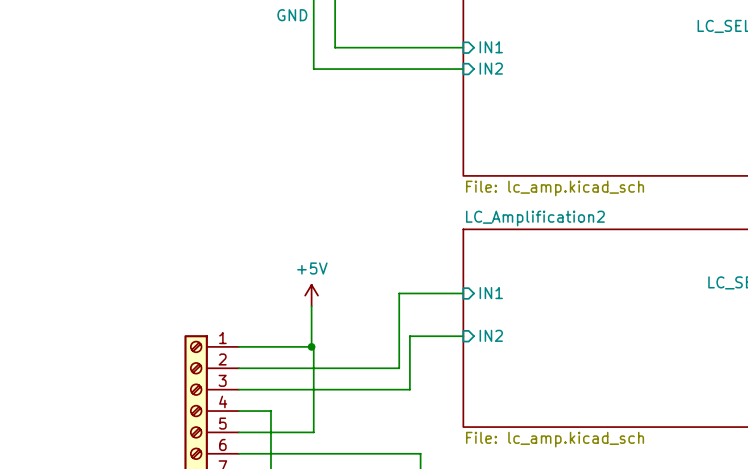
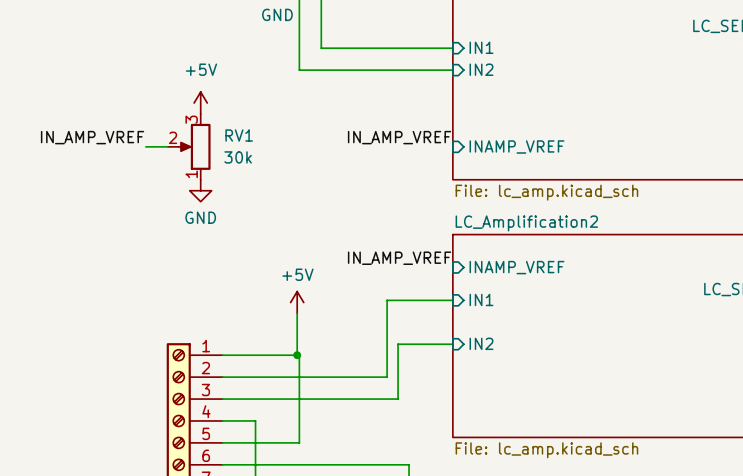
power symbol: none -> +5V (200, 103)
label: none -> IN_AMP_VREF (92, 137)
label: none -> IN_AMP_VREF (399, 137)
wire: none -> (145, 146) (167, 146)
RV1: none -> 30k (189, 146)
sheet pin: none -> INAMP_VREF (517, 146)
power symbol: none -> GND (200, 190)
label: none -> IN_AMP_VREF (399, 258)
sheet pin: none -> INAMP_VREF (517, 267)

